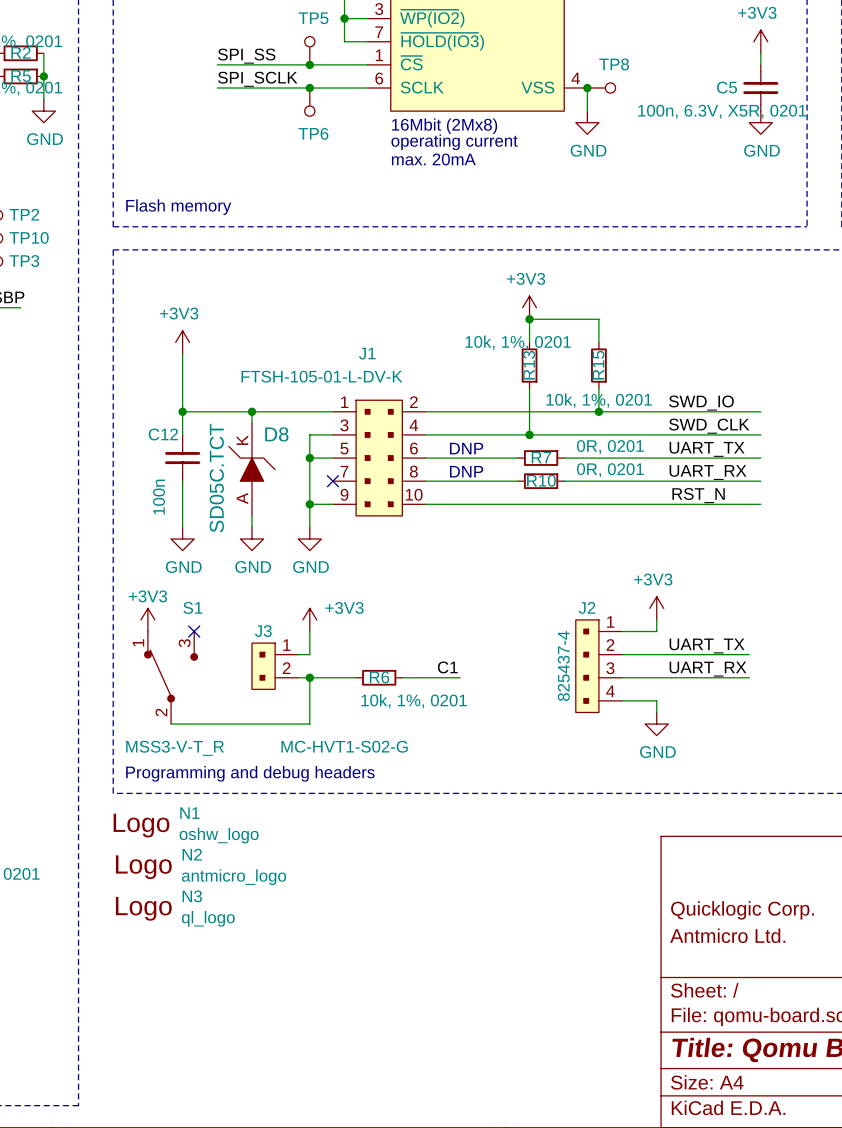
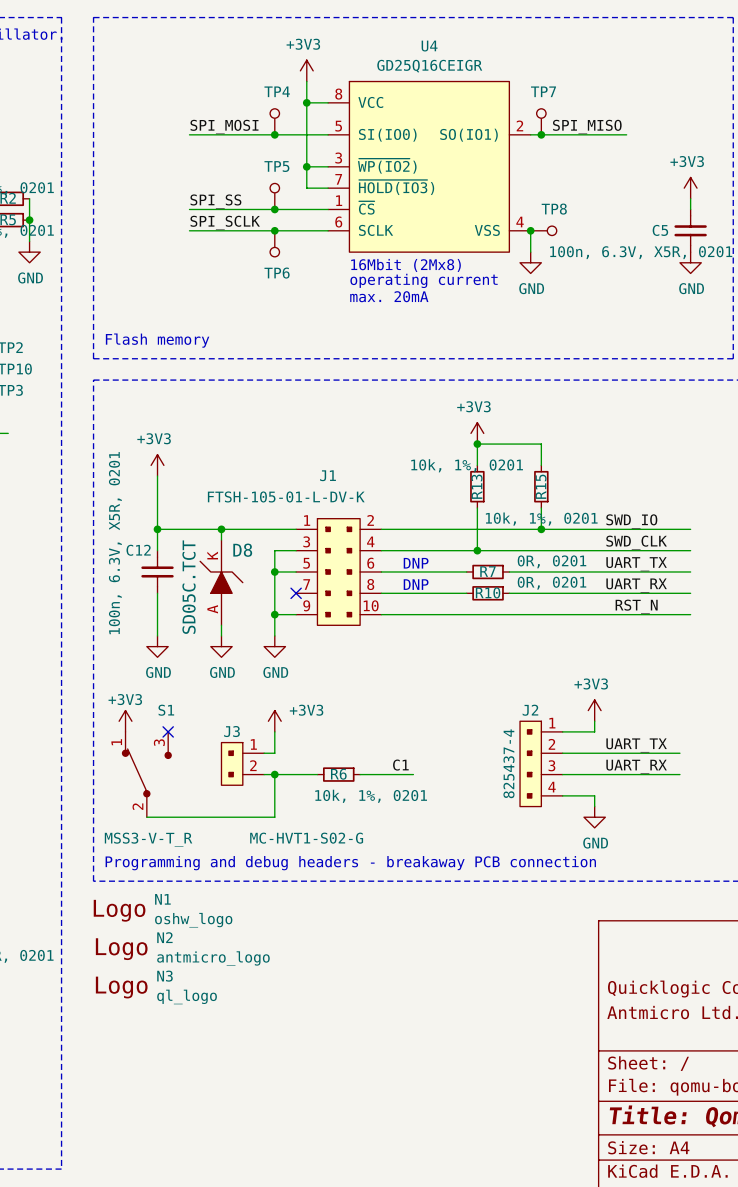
C12 value: 100n (159, 497) -> 100n, 6.3V, X5R, 0201 (115, 543)
text: Programming and debug headers (250, 773) -> Programming and debug headers - breakaway PCB connection (350, 863)

